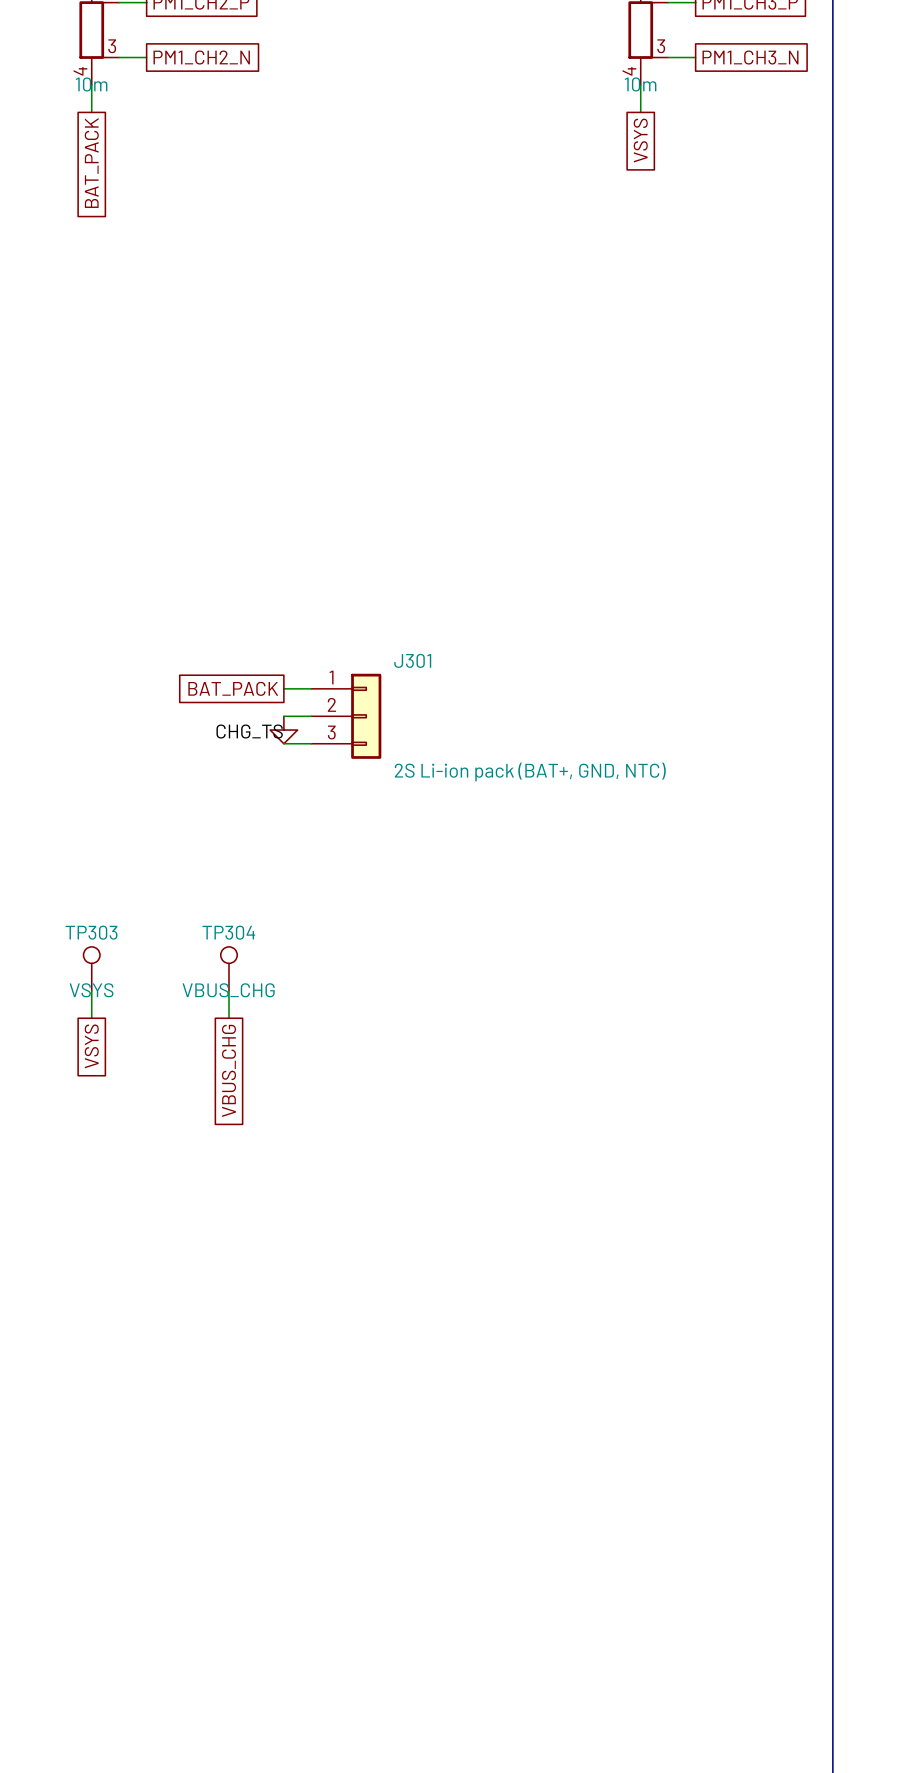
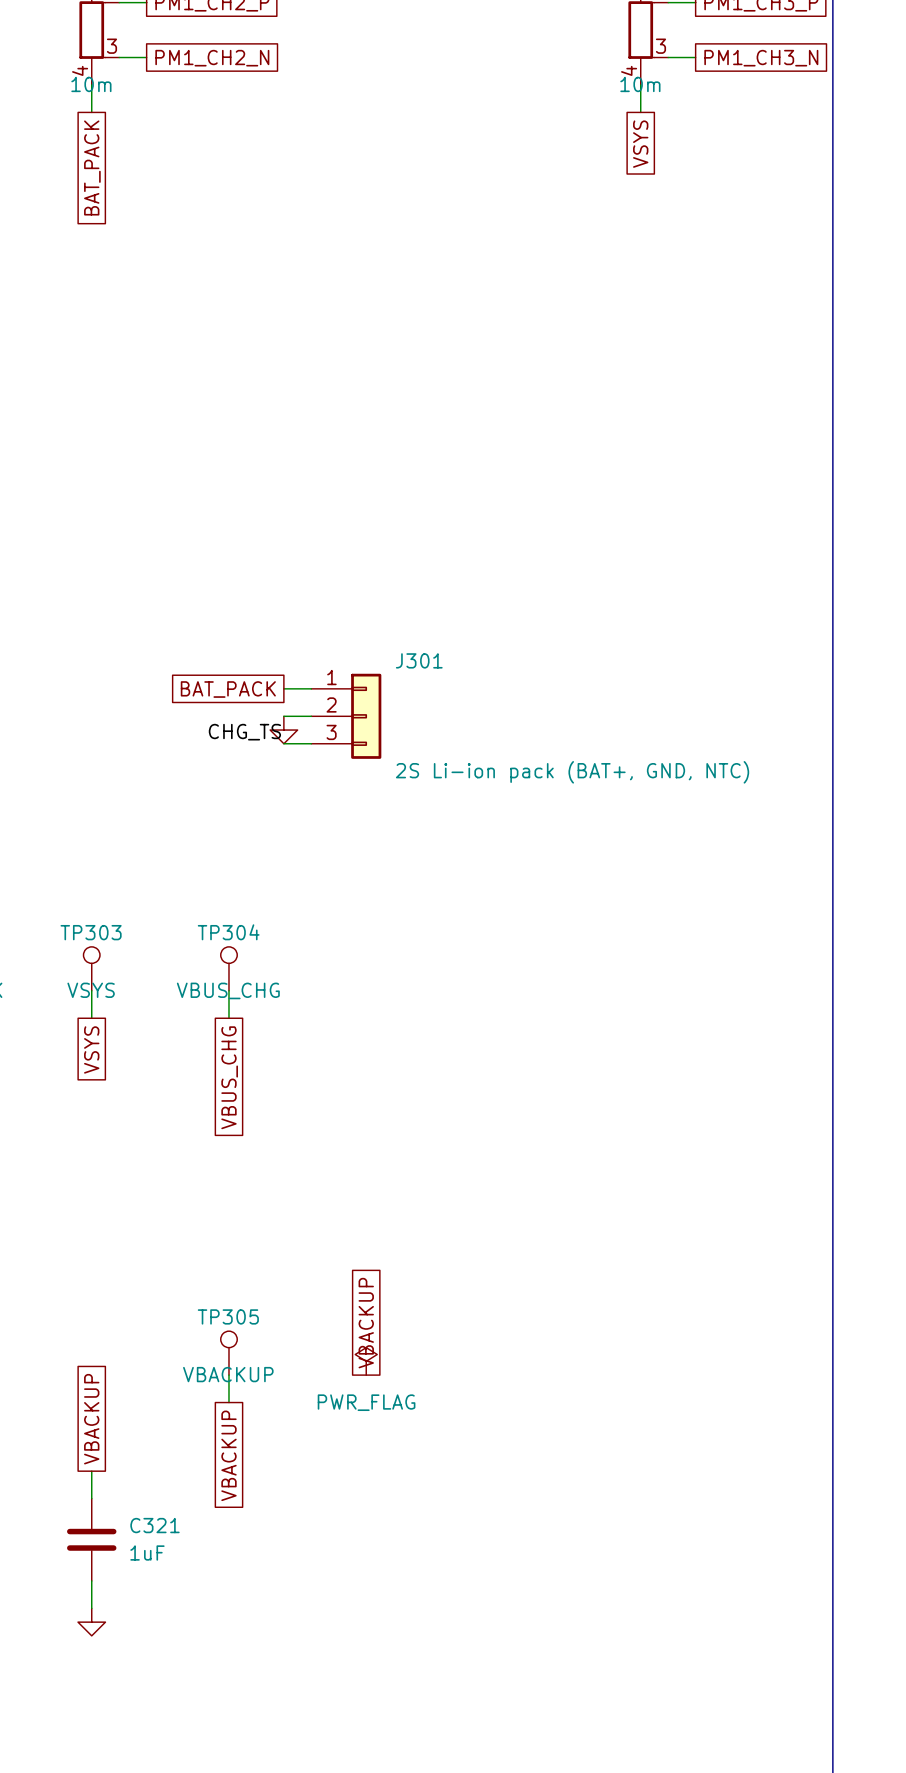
global label: none -> VBACKUP (366, 1323)
TP305: none -> VBACKUP (228, 1353)
power symbol: none -> PWR_FLAG (366, 1361)
wire: none -> (228, 1375) (228, 1402)
global label: none -> VBACKUP (91, 1419)
global label: none -> VBACKUP (228, 1455)
wire: none -> (91, 1471) (91, 1498)
C321: none -> 1uF (91, 1539)
wire: none -> (91, 1580) (91, 1608)
power symbol: none -> (91, 1622)

